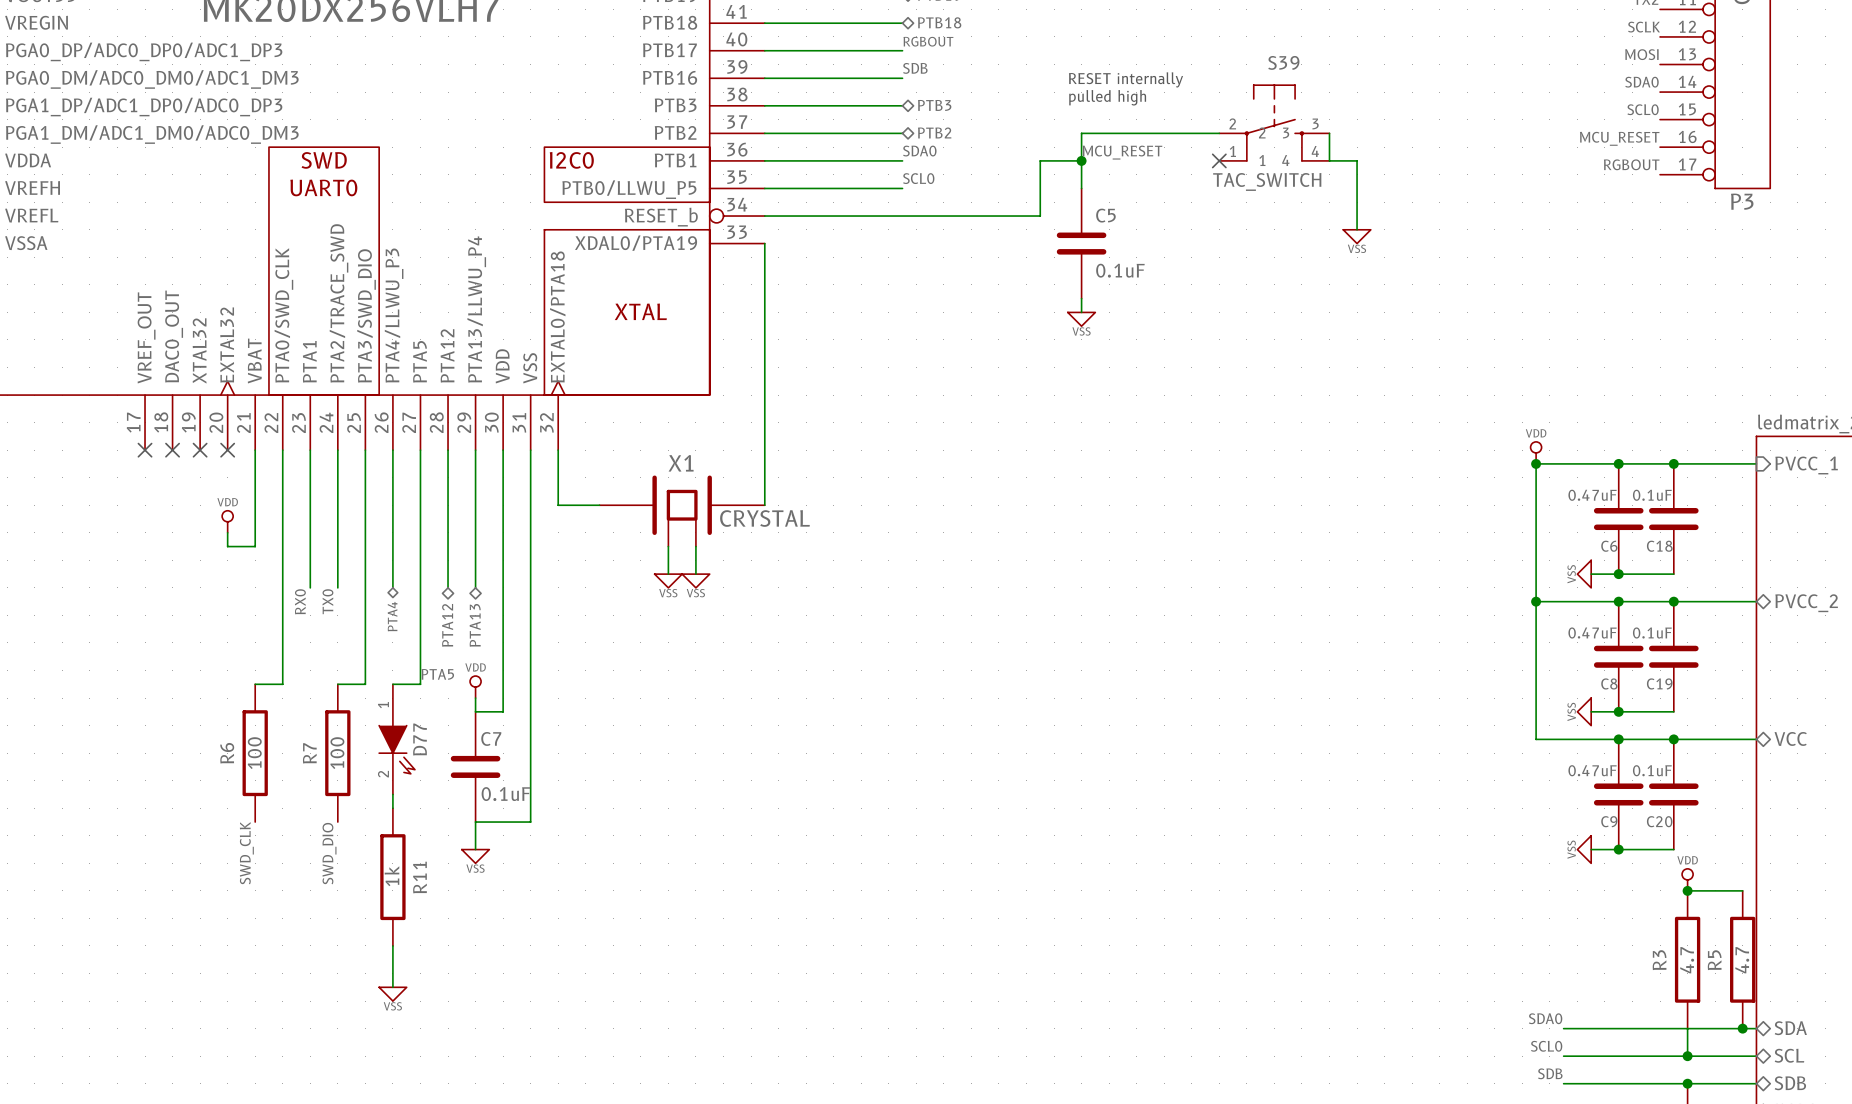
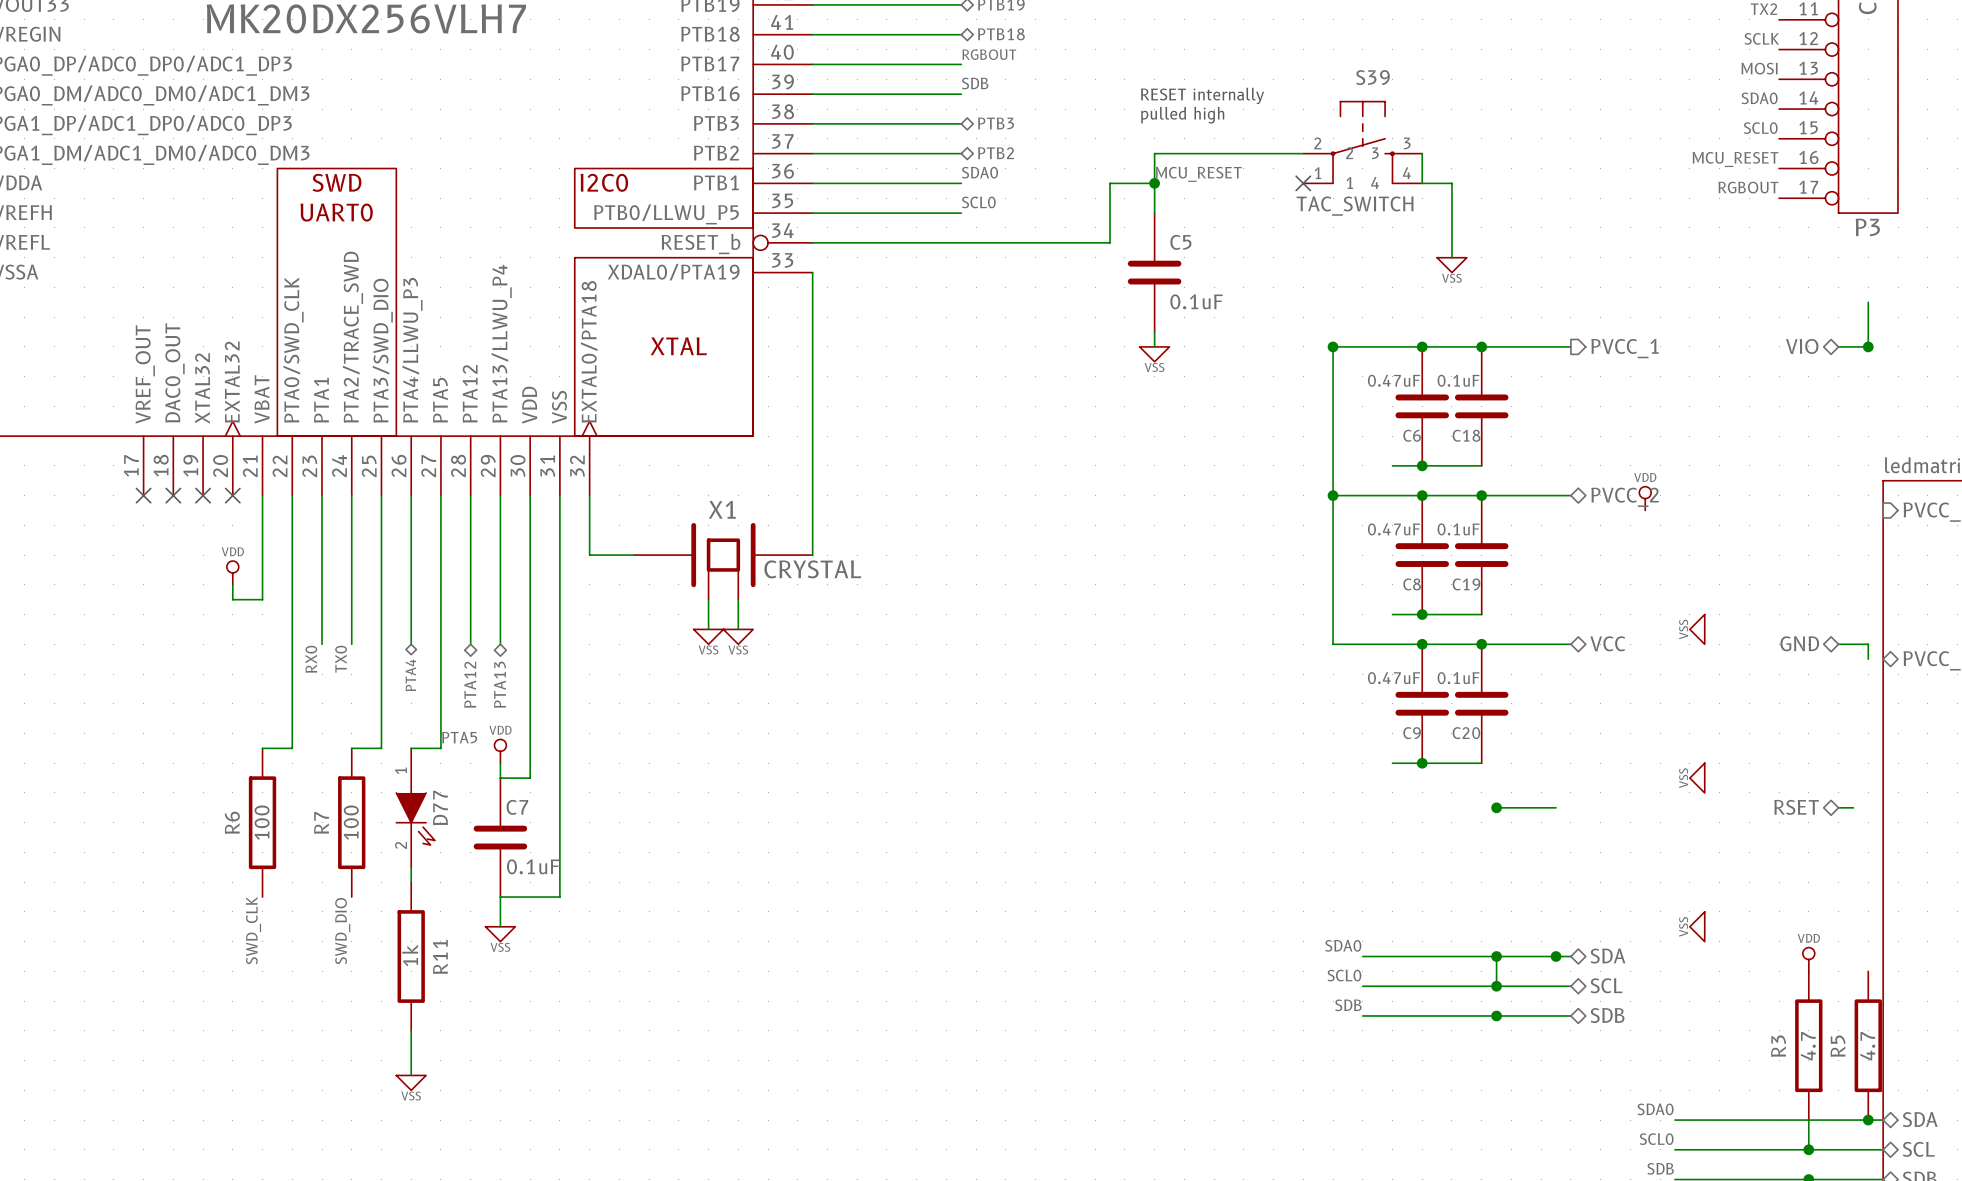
wire: none -> (1868, 302) (1868, 346) (1838, 346)
junction: none -> (1333, 346)
junction: none -> (1422, 346)
junction: none -> (1481, 346)
wire: none -> (1570, 346) (1333, 346) (1333, 644) (1570, 644)
sheet pin: none -> VIO (1802, 346)
junction: none -> (1868, 346)
sheet pin: none -> PVCC_1 (1625, 348)
wire: none -> (1392, 465) (1481, 465)
junction: none -> (1422, 465)
wire: none -> (1333, 495) (1570, 495)
junction: none -> (1333, 495)
junction: none -> (1422, 495)
junction: none -> (1481, 495)
sheet pin: none -> PVCC_2 (1625, 497)
junction: (1536, 463) -> none
junction: (1618, 463) -> none
junction: (1673, 463) -> none
wire: (1756, 463) (1536, 463) (1536, 739) (1715, 739) -> none
C6 position: (1618, 519) -> (1422, 406)
C18 position: (1673, 519) -> (1481, 406)
wire: none -> (1392, 614) (1481, 614)
junction: none -> (1422, 614)
wire: (1591, 574) (1673, 574) -> none
junction: (1618, 574) -> none
junction: none -> (1422, 644)
junction: none -> (1481, 644)
sheet pin: none -> VCC (1607, 643)
sheet pin: none -> GND (1799, 643)
wire: none -> (1838, 644) (1868, 644) (1868, 659)
wire: (1536, 601) (1756, 601) -> none
junction: (1536, 601) -> none
junction: (1618, 601) -> none
junction: (1673, 601) -> none
C8 position: (1618, 656) -> (1422, 555)
C19 position: (1673, 656) -> (1481, 555)
wire: none -> (1392, 763) (1481, 763)
junction: none -> (1422, 763)
wire: (1591, 711) (1673, 711) -> none
junction: (1618, 711) -> none
sheet pin: none -> RSET (1796, 807)
sheet pin: VCC (1790, 738) -> none
wire: none -> (1496, 807) (1556, 807)
junction: none -> (1496, 807)
junction: (1618, 739) -> none
junction: (1673, 739) -> none
wire: (1728, 739) (1756, 739) -> none
C9 position: (1618, 794) -> (1422, 703)
C20 position: (1673, 794) -> (1481, 703)
wire: (1591, 849) (1673, 849) -> none
junction: (1618, 849) -> none
label: none -> SDA0 (1343, 945)
sheet pin: none -> SDA (1607, 956)
wire: none -> (1362, 956) (1570, 956)
wire: none -> (1496, 956) (1496, 986)
junction: none -> (1496, 956)
junction: none -> (1556, 956)
wire: (1687, 890) (1742, 890) -> none
junction: (1687, 890) -> none
label: none -> SCL0 (1344, 975)
wire: none -> (1362, 986) (1570, 986)
junction: none -> (1496, 986)
sheet pin: none -> SCL (1606, 985)
label: none -> SDB (1348, 1005)
sheet pin: none -> SDB (1607, 1015)
wire: none -> (1362, 1015) (1570, 1015)
junction: none -> (1496, 1015)

